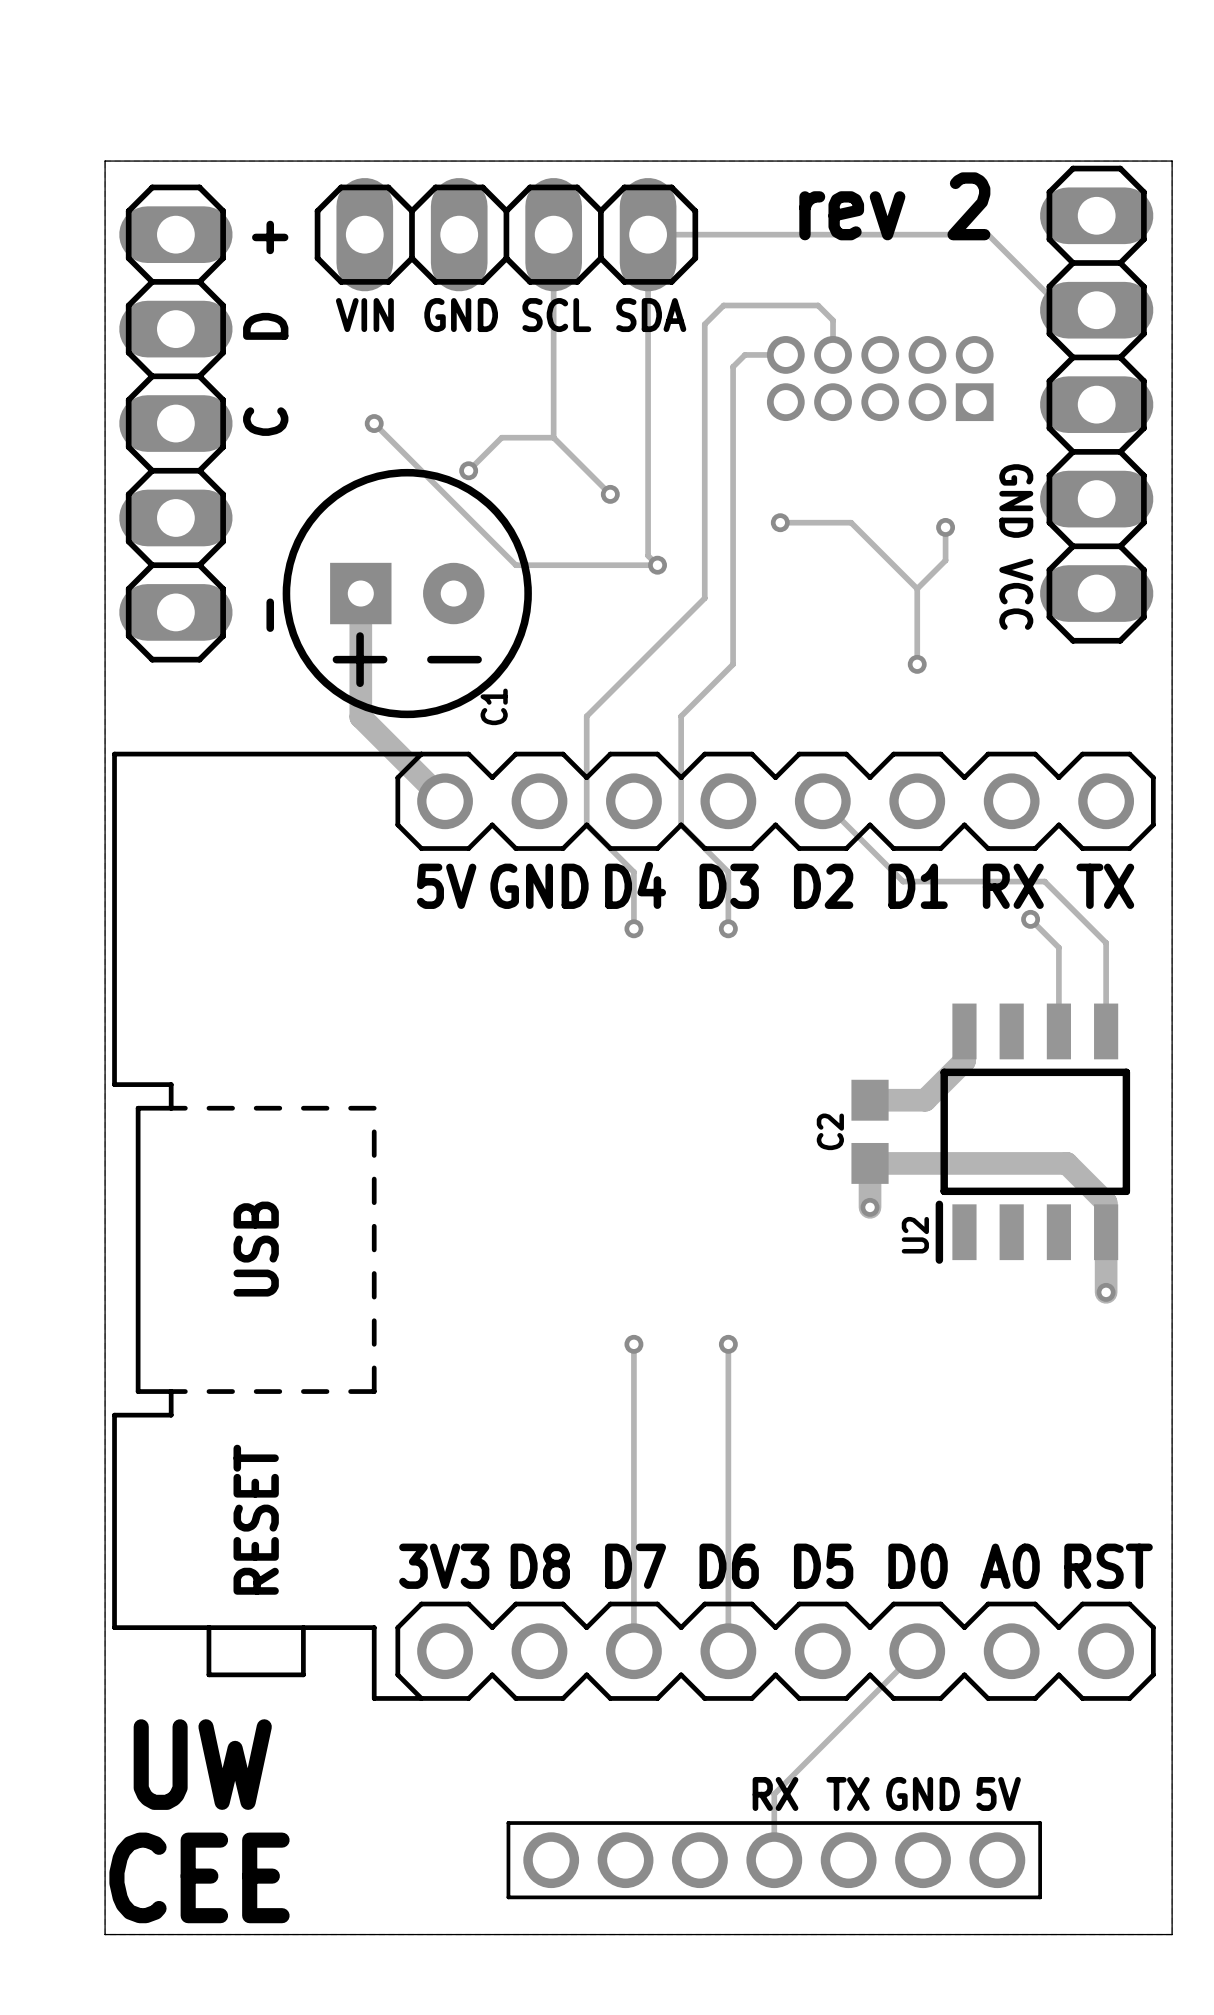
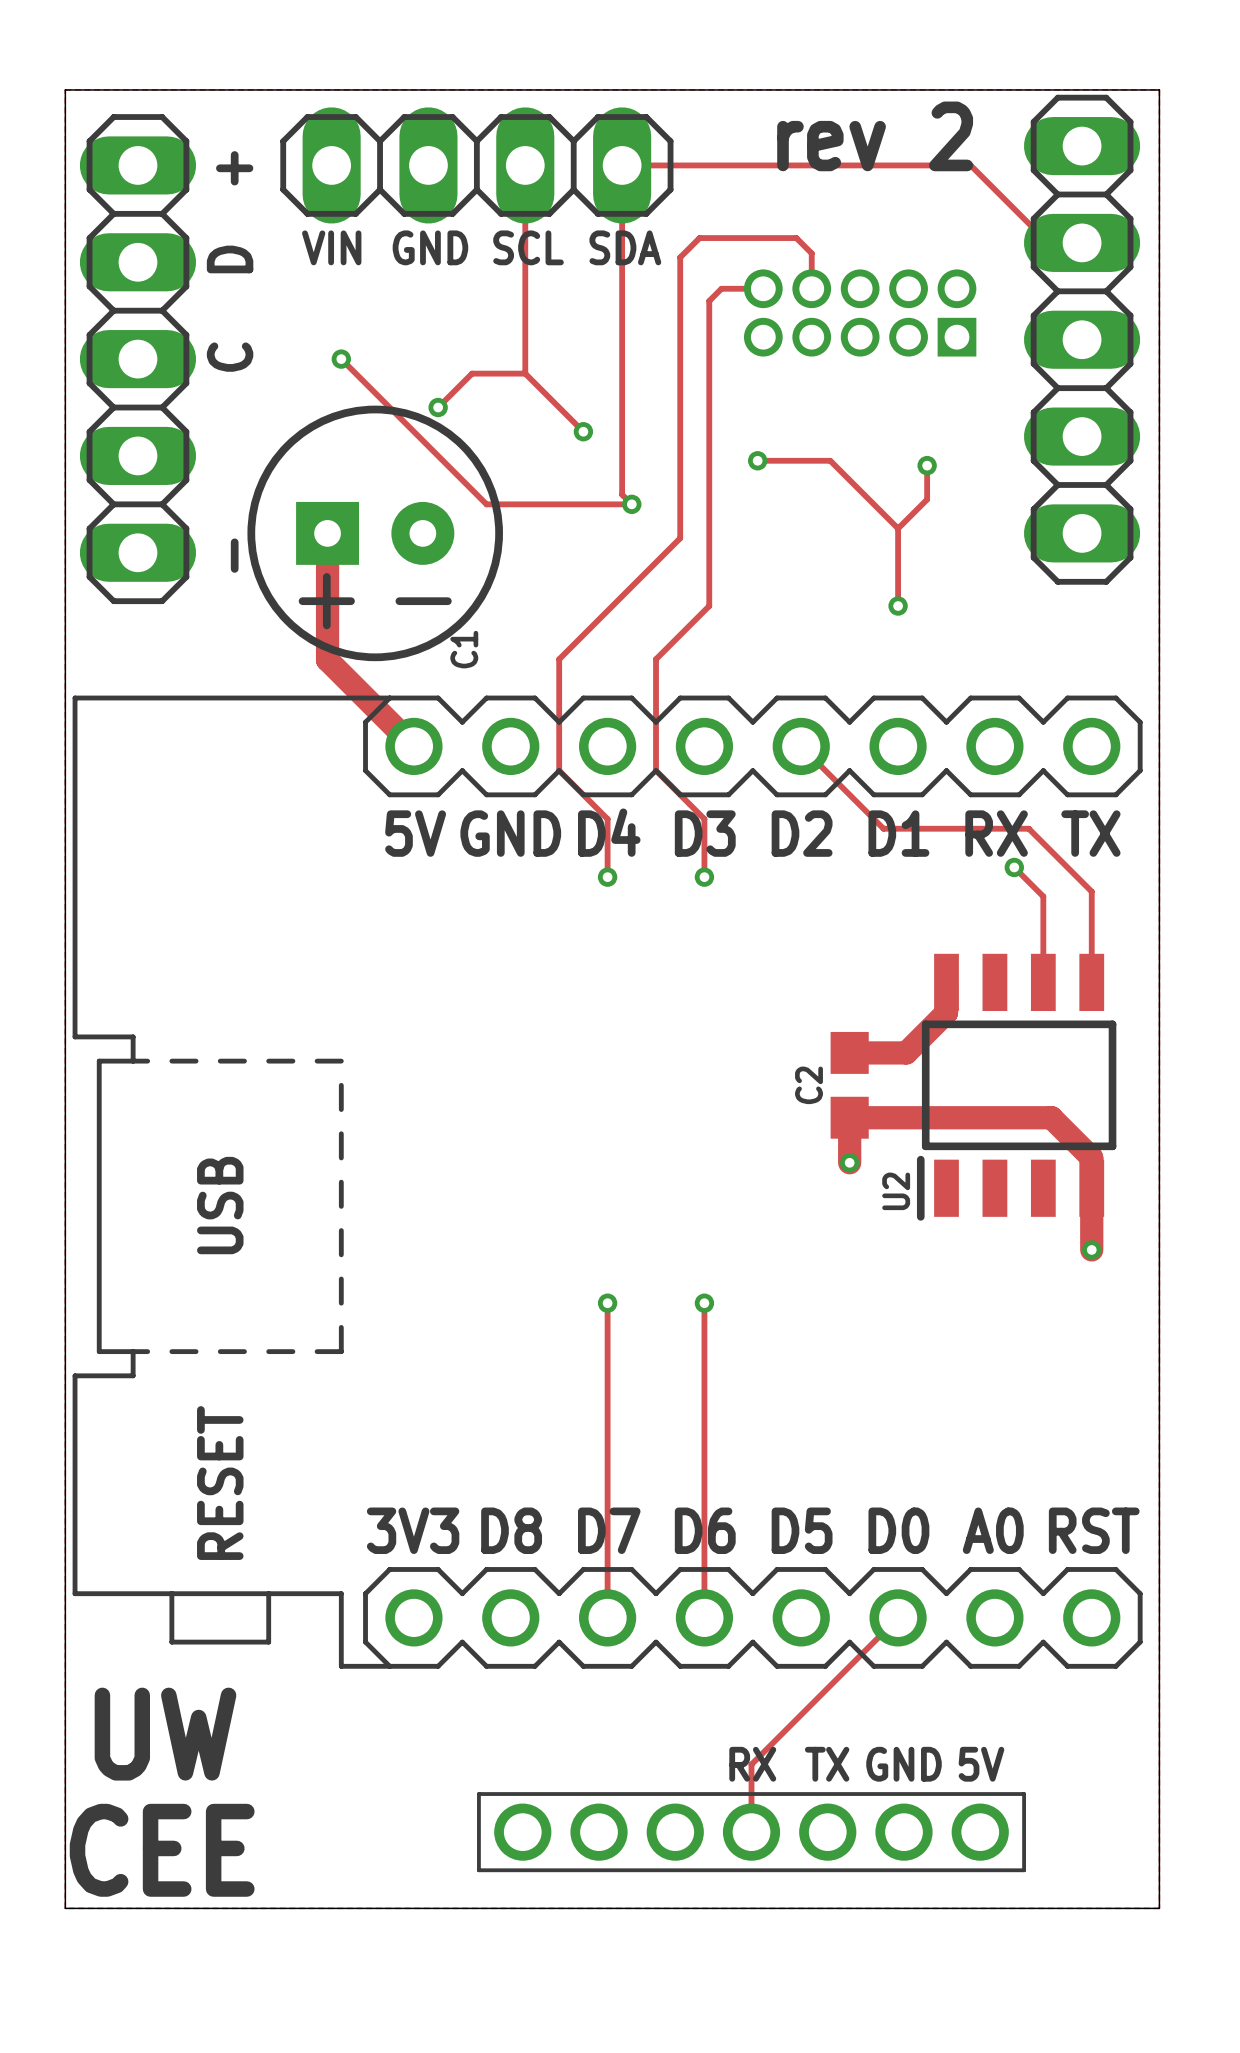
text: GND (1016, 501) -> none
text: VCC (1016, 594) -> none

